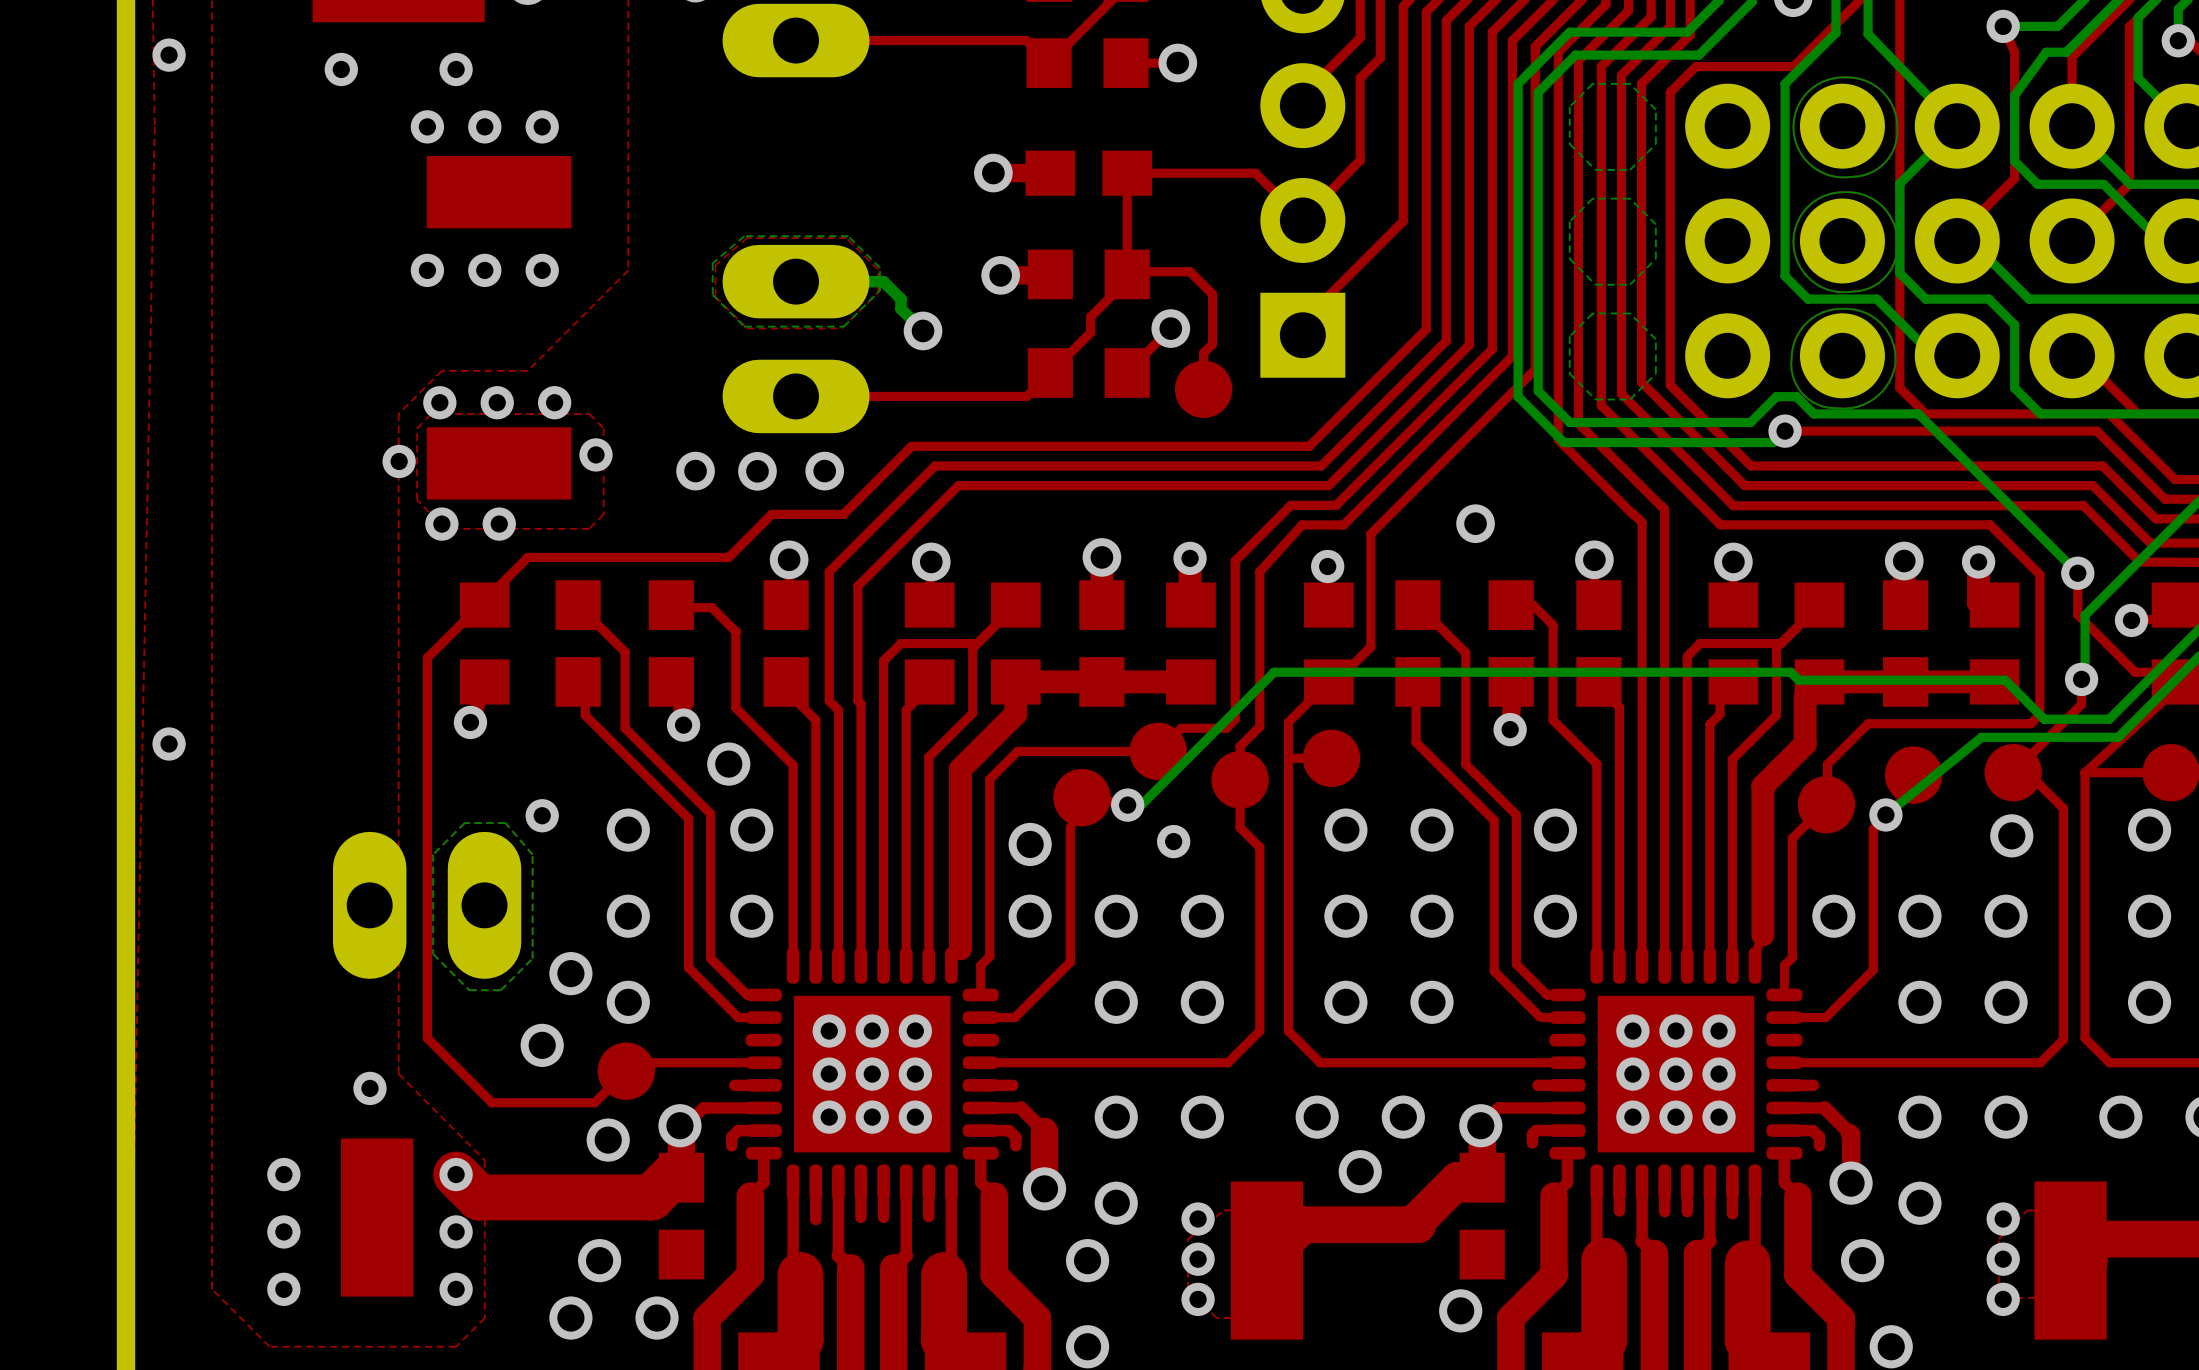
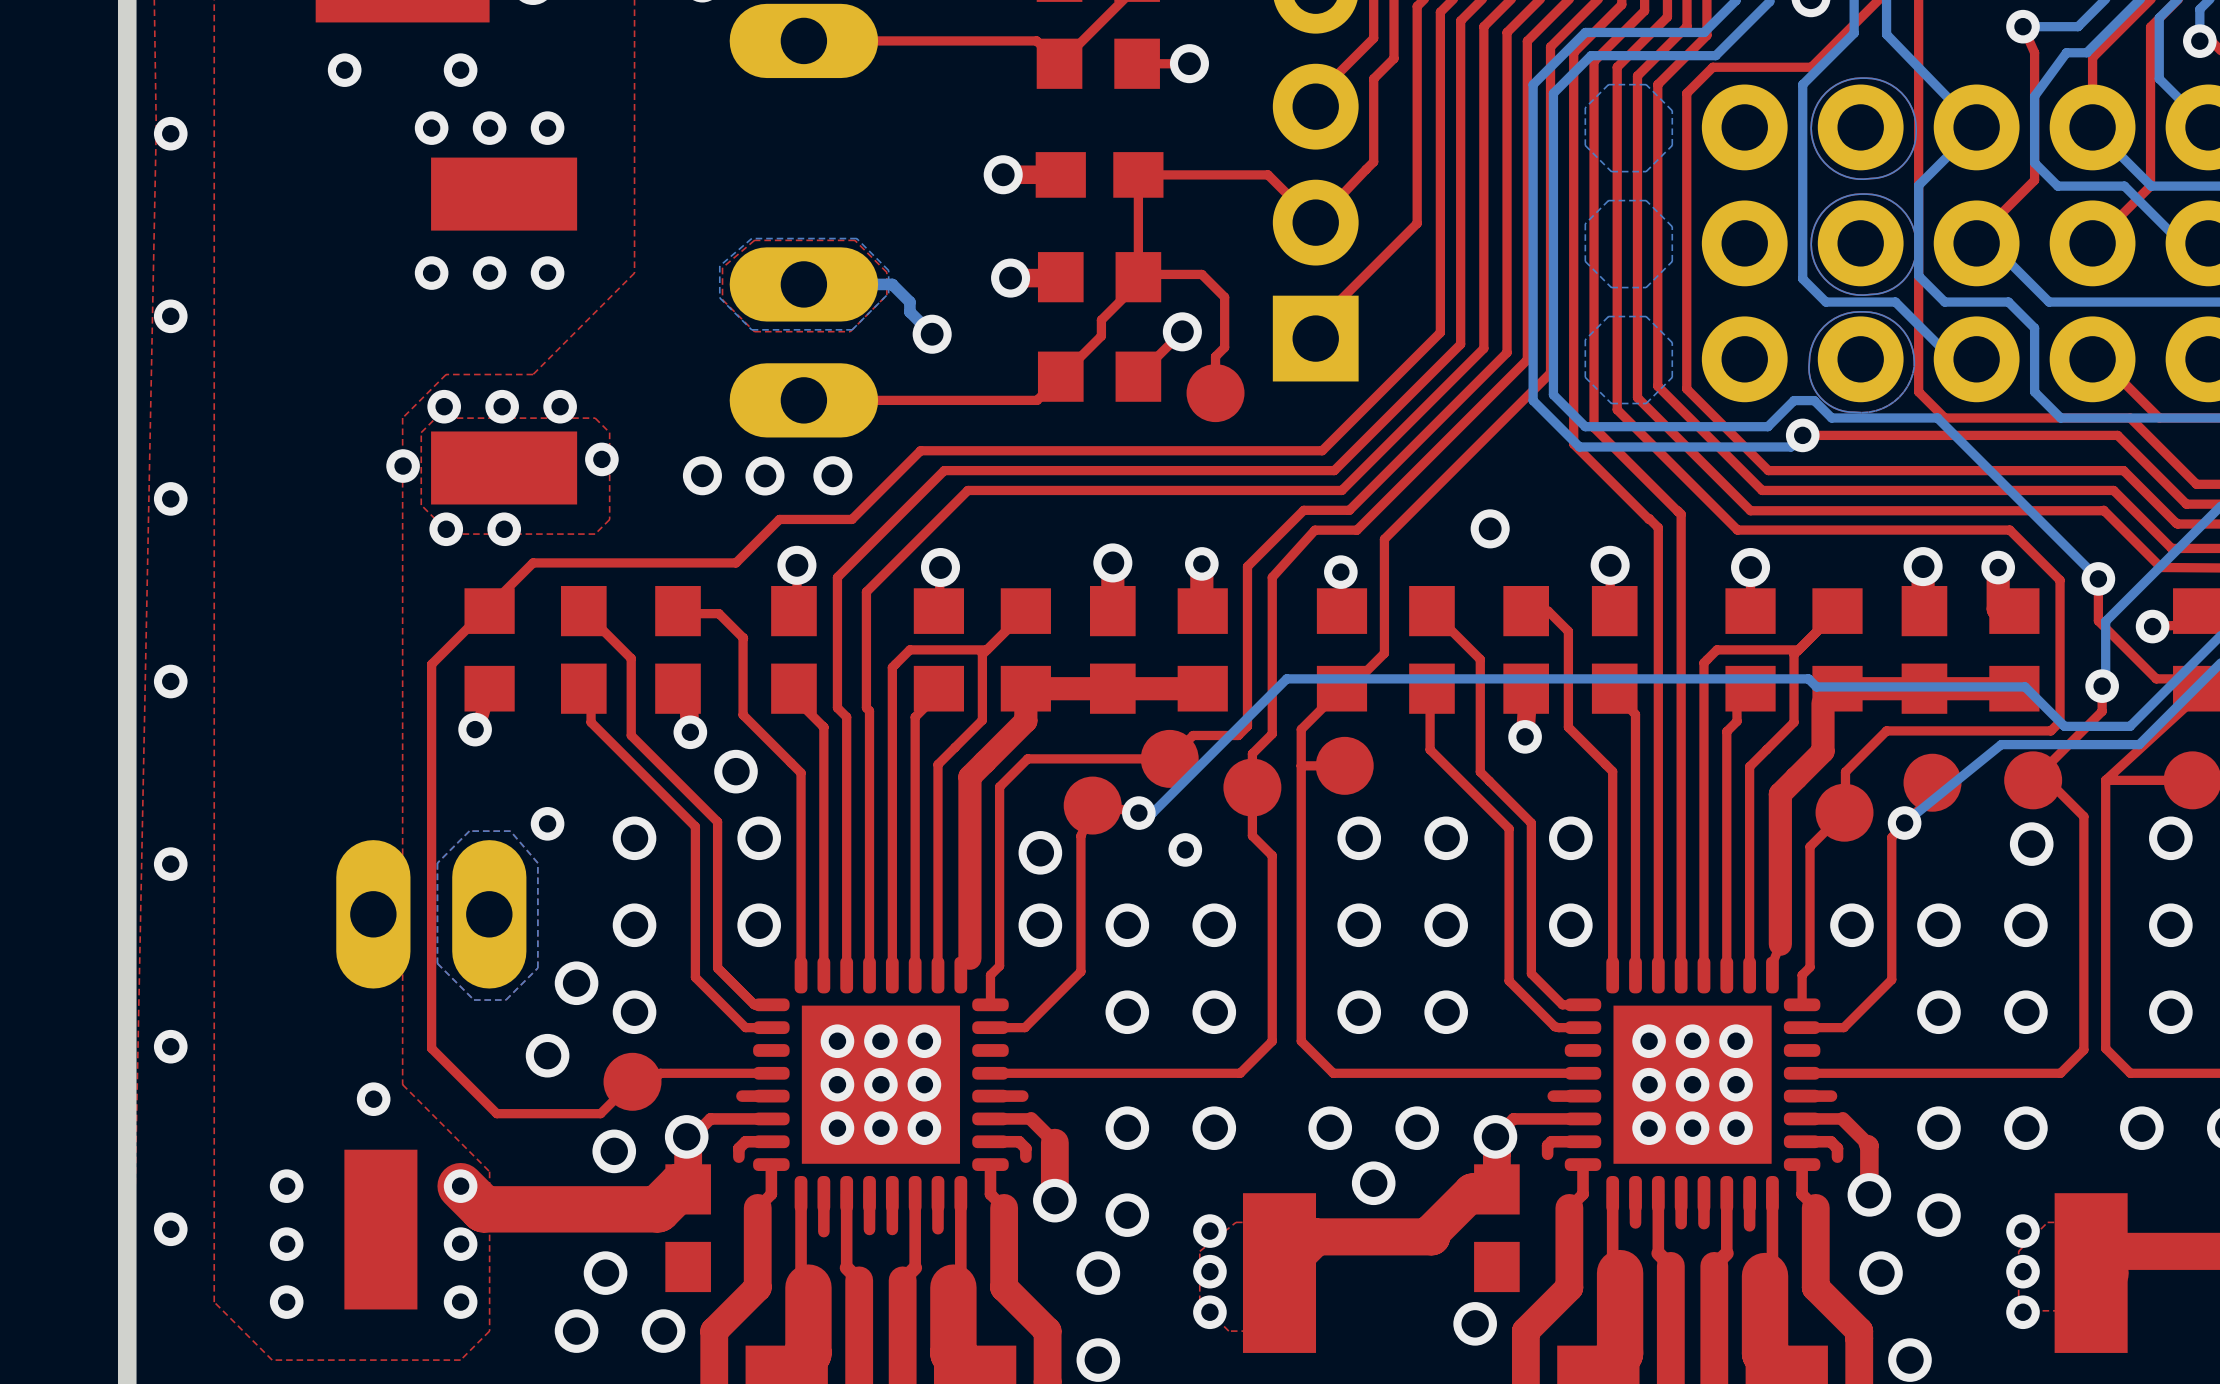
via: (169, 55) -> none
via: none -> (170, 133)
via: none -> (170, 316)
via: none -> (170, 498)
via: none -> (170, 681)
via: (169, 743) -> none
via: none -> (170, 864)
via: none -> (170, 1046)
via: none -> (170, 1229)

